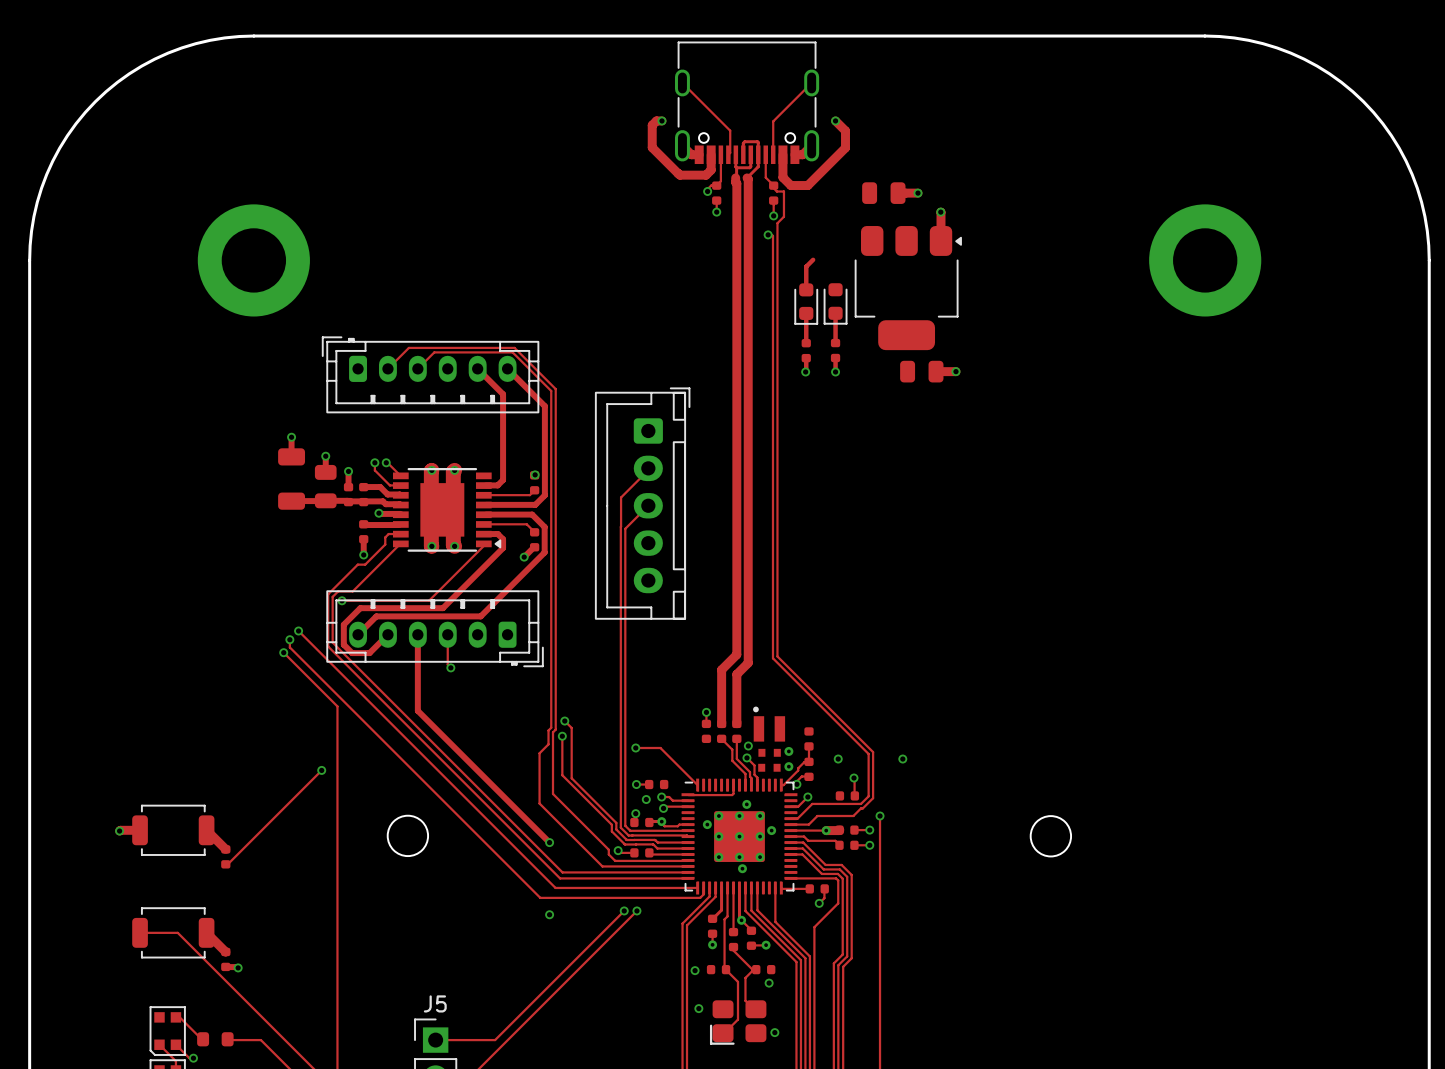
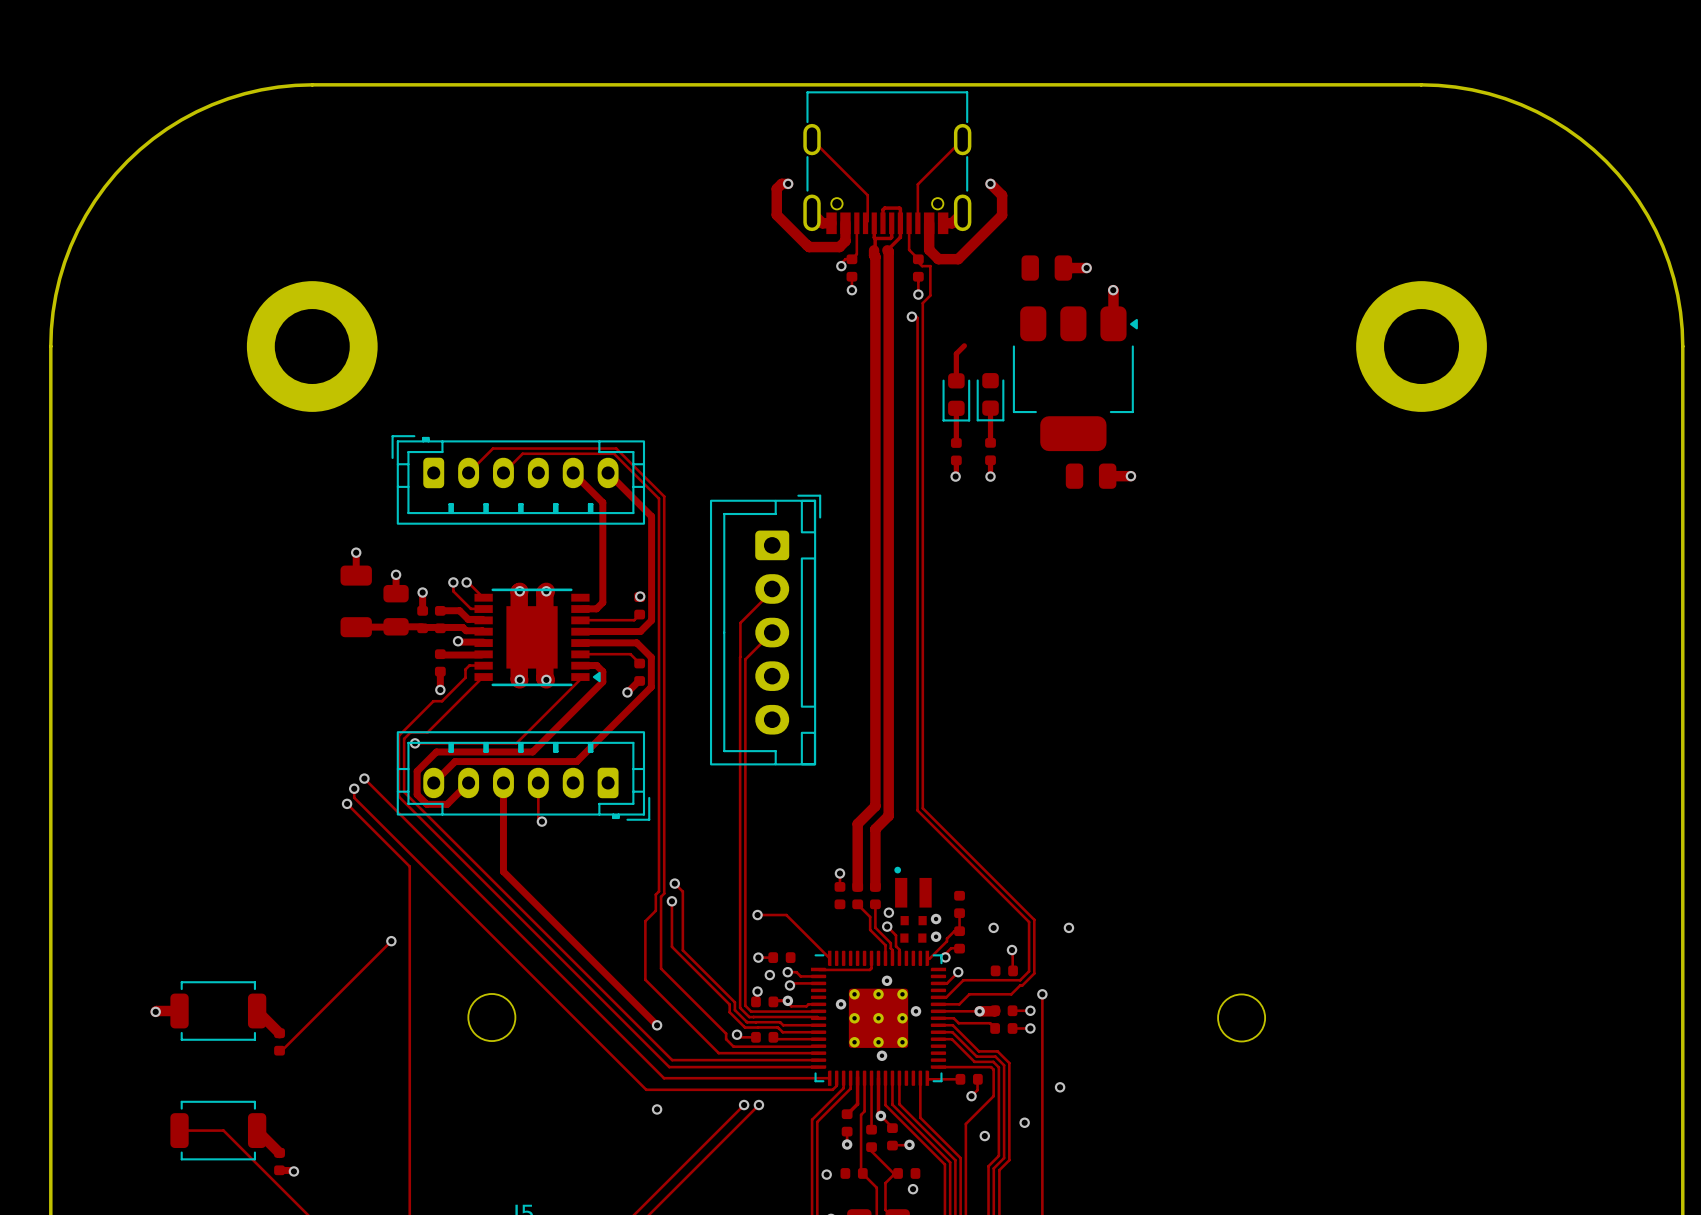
via: none -> (1060, 1087)
via: none -> (1024, 1122)
via: none -> (984, 1136)

